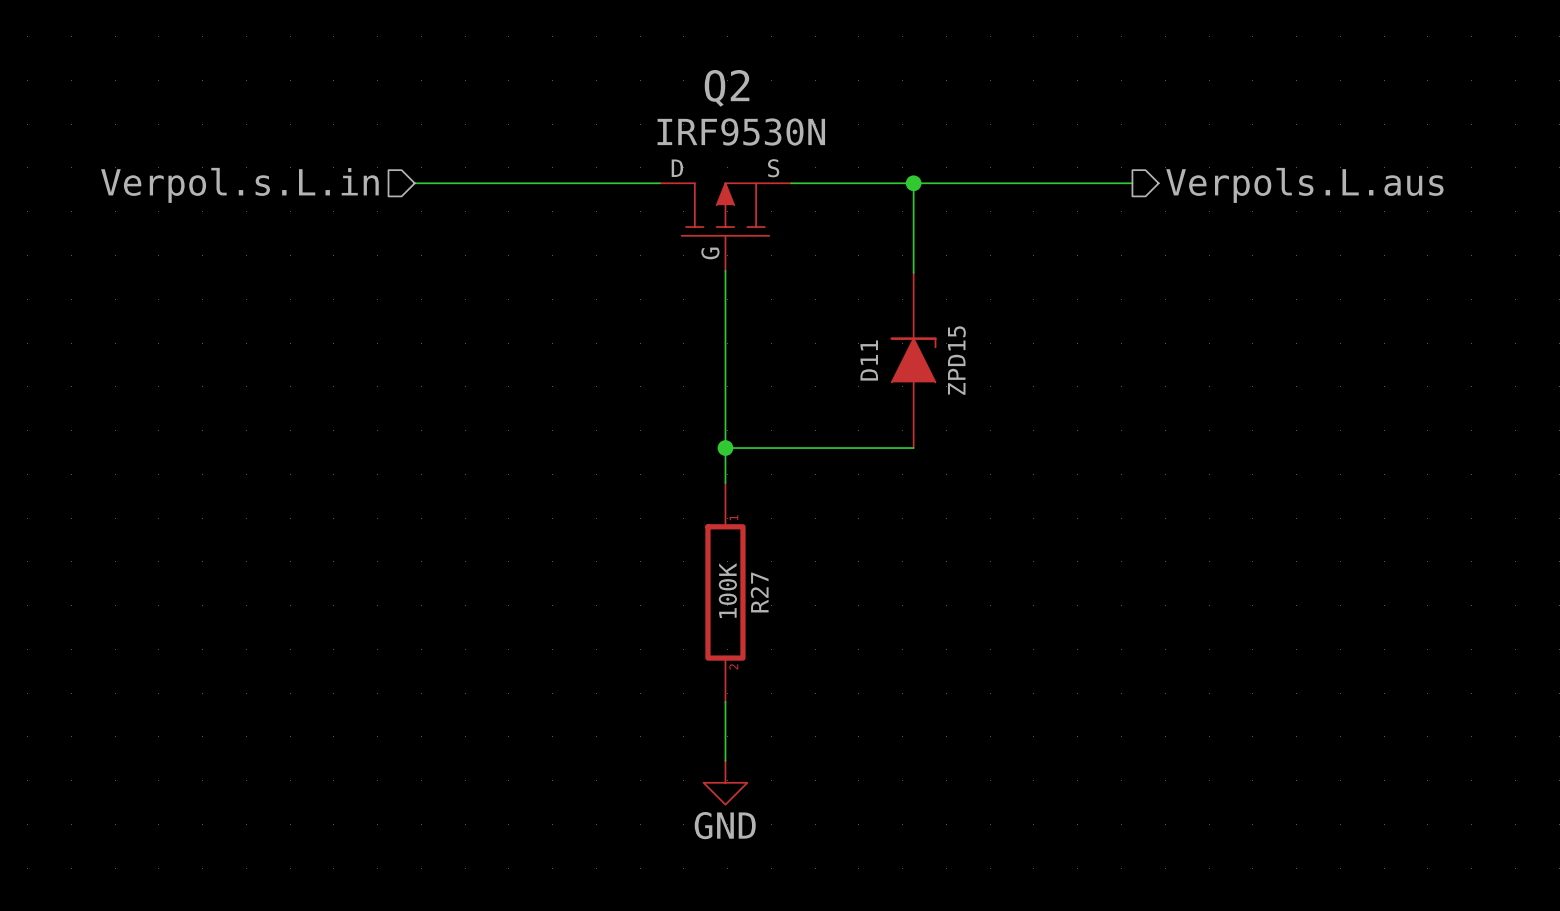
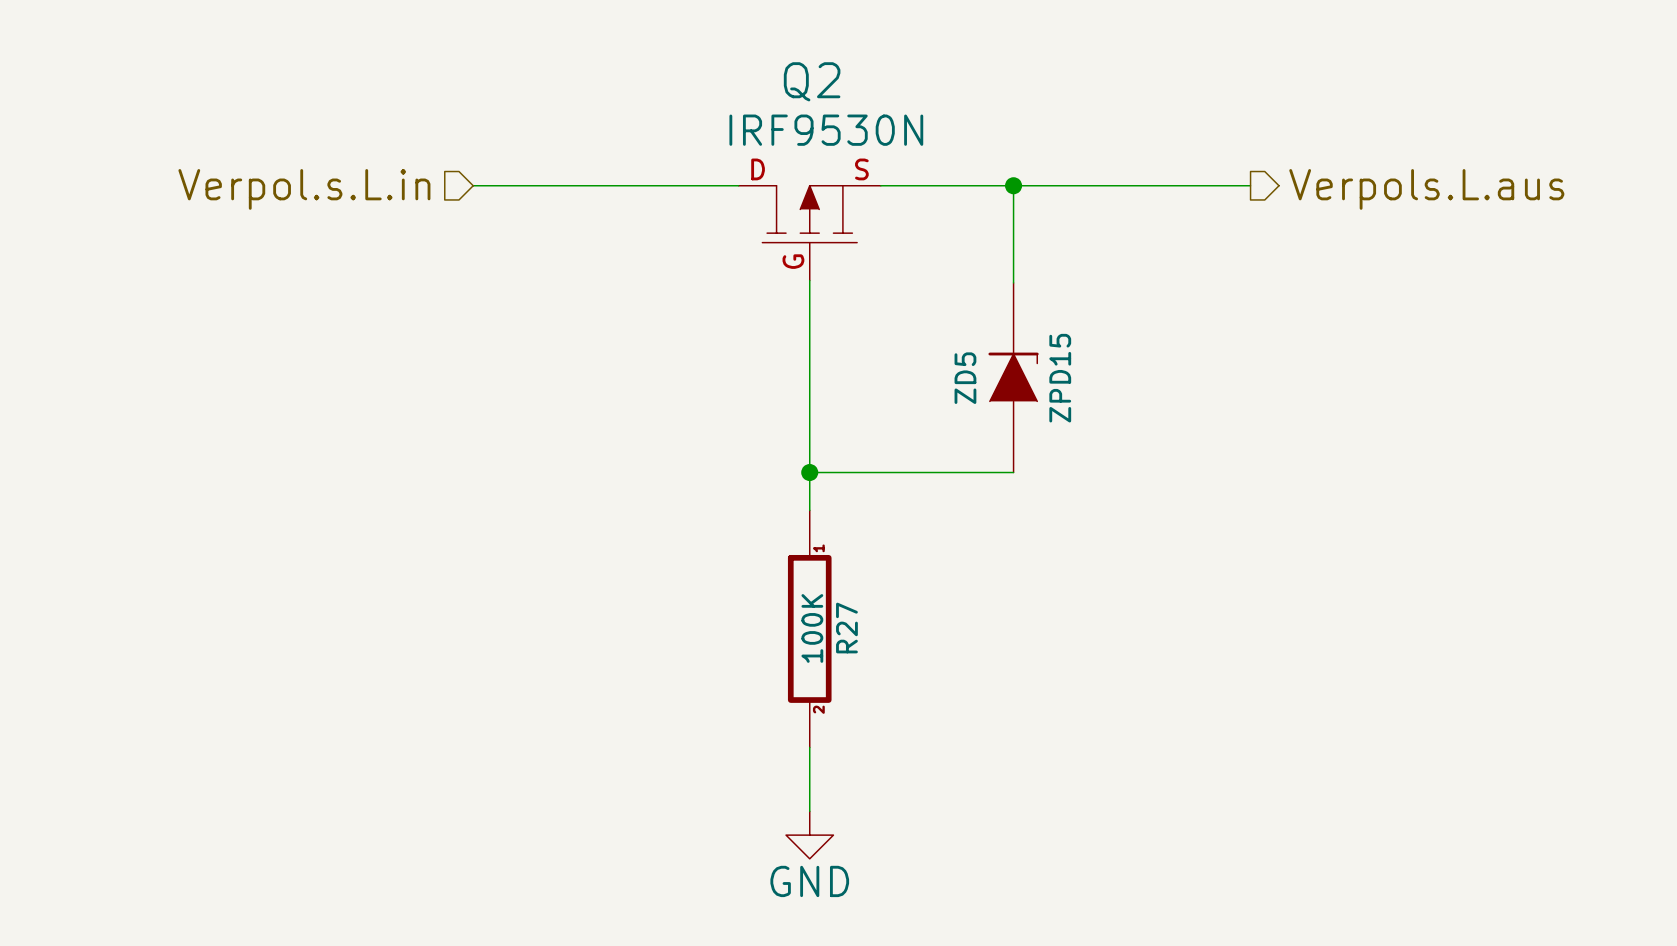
D11 name: D11 (869, 360) -> ZD5 (965, 378)

